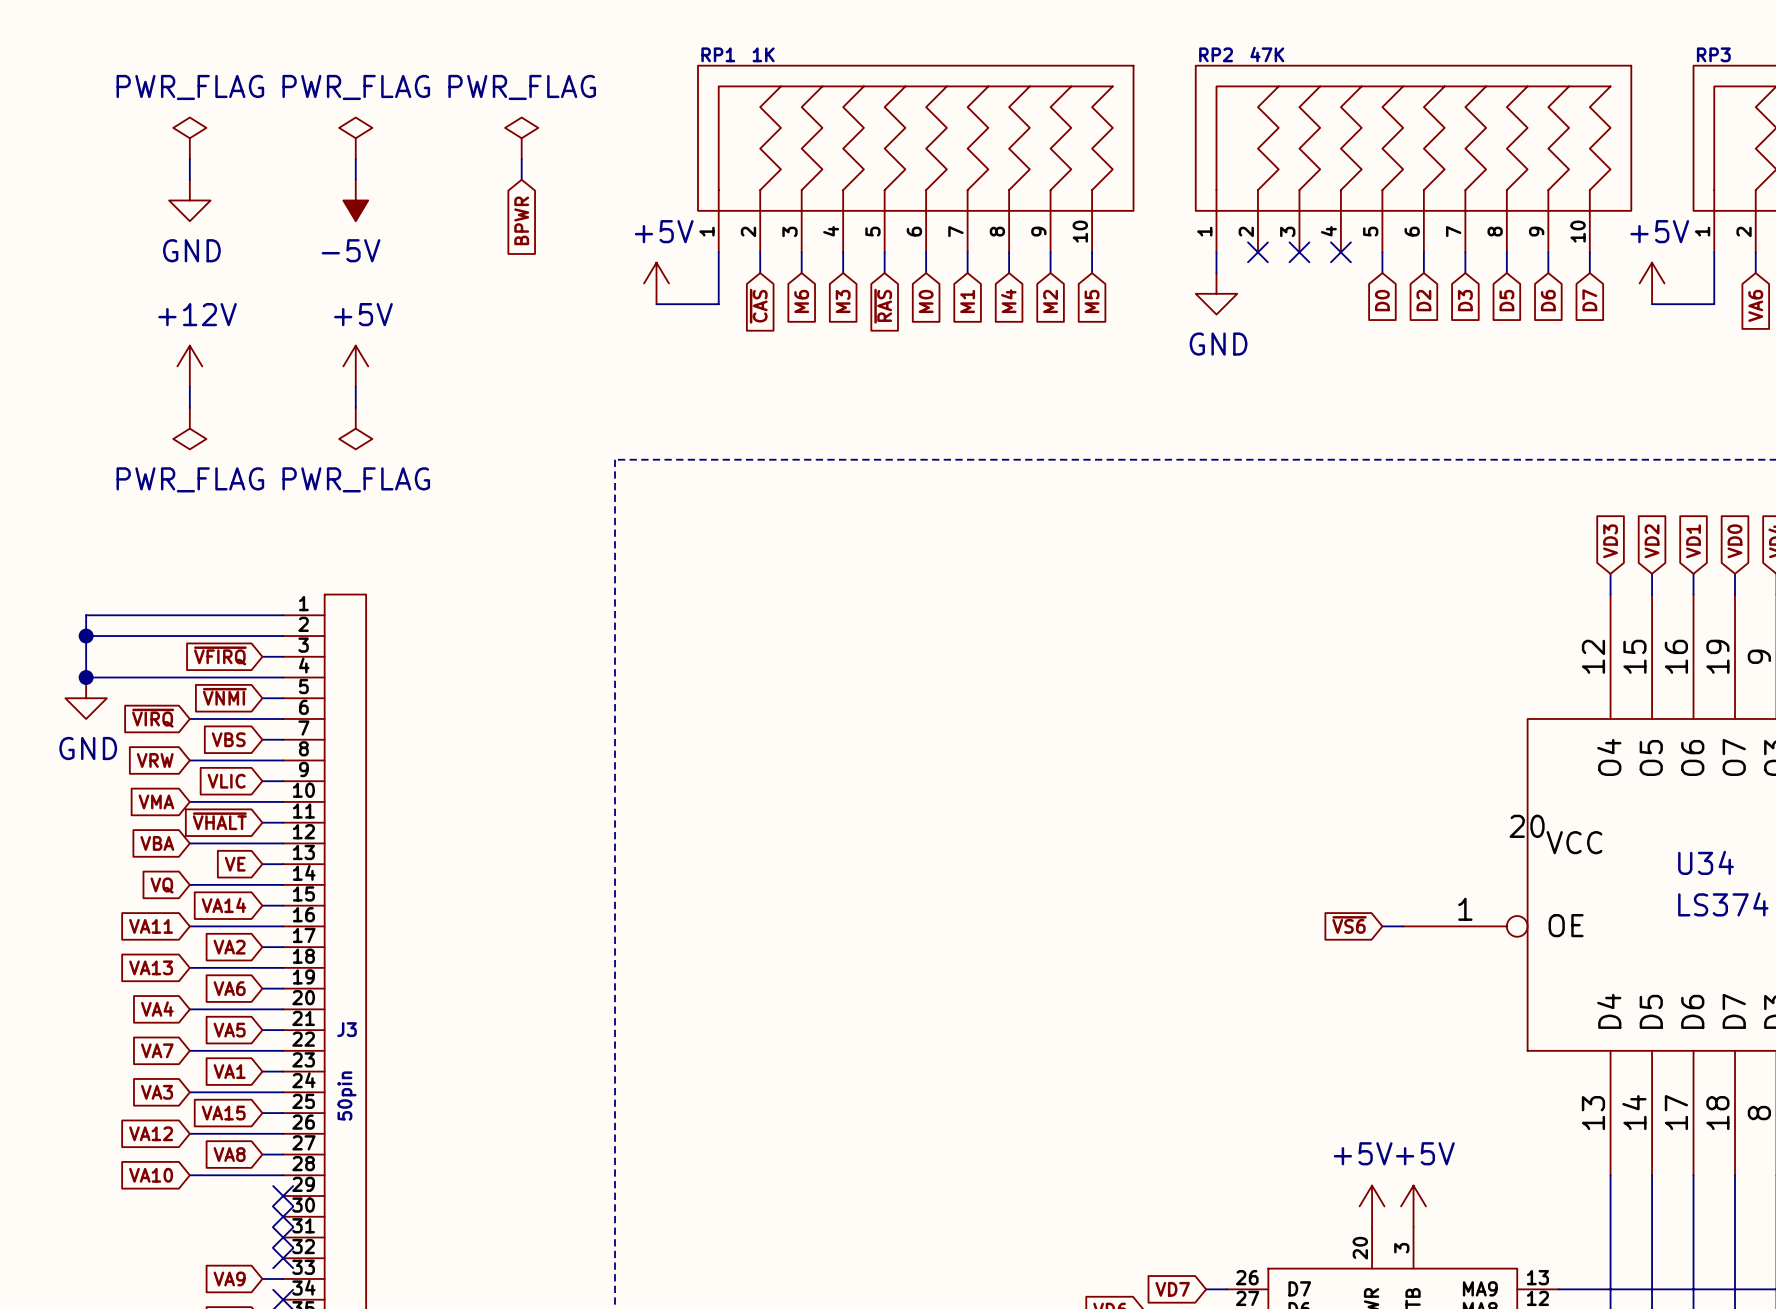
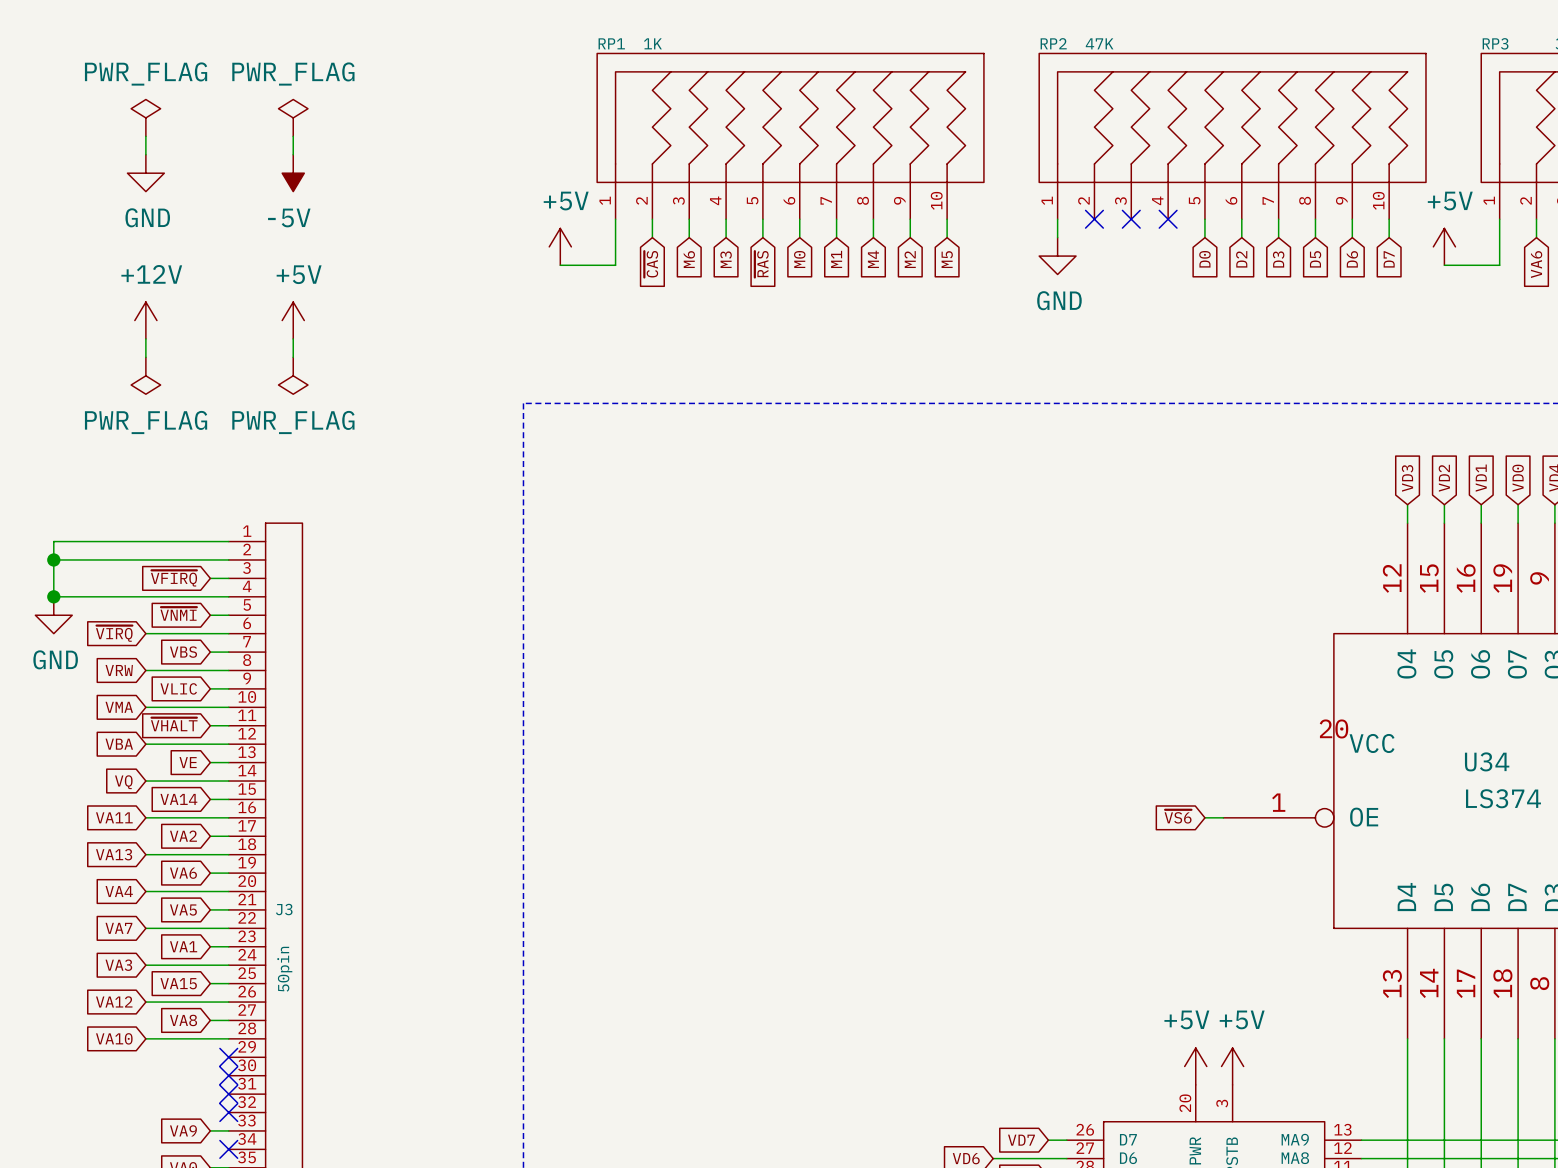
power symbol: PWR_FLAG (521, 138) -> none
wire: (521, 159) (521, 179) -> none
global label: BPWR (521, 220) -> none

